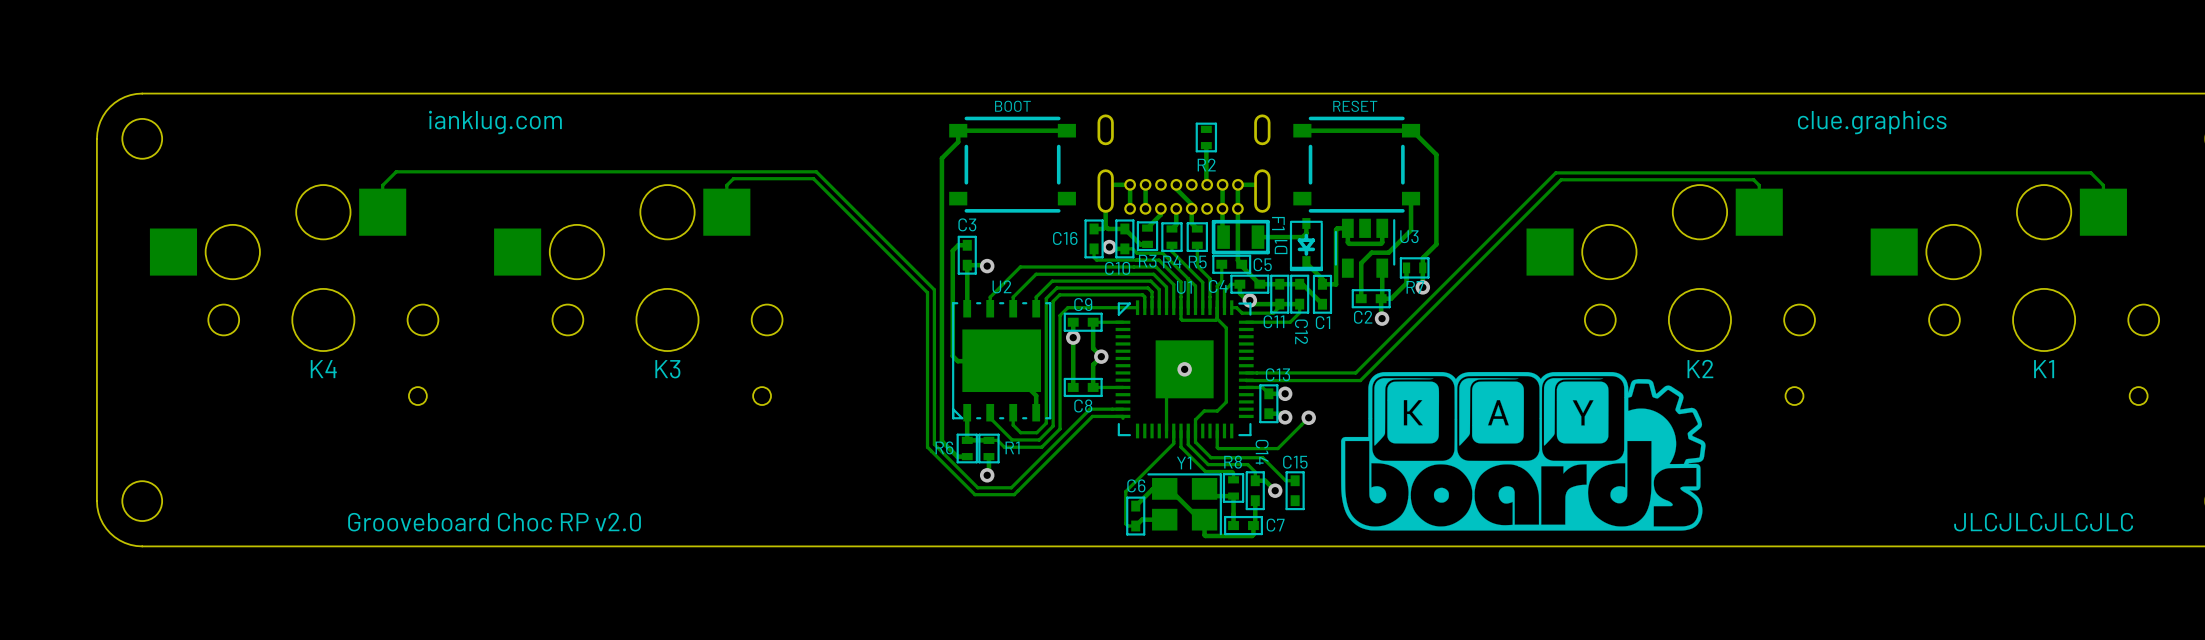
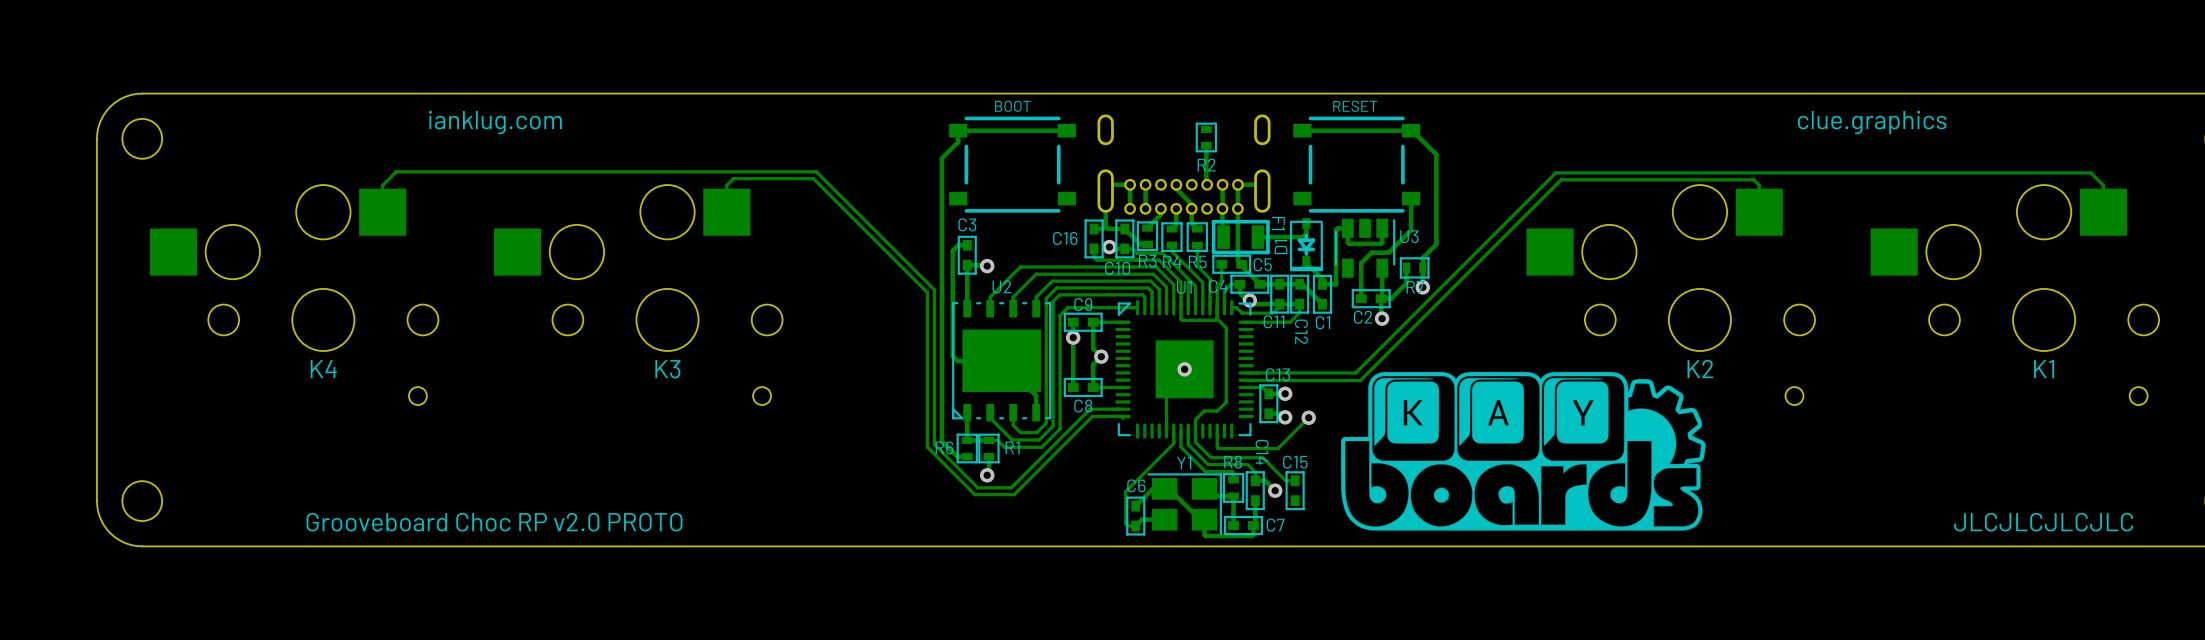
text: Grooveboard Choc RP v2.0 (494, 522) -> Grooveboard Choc RP v2.0 PROTO (494, 522)

